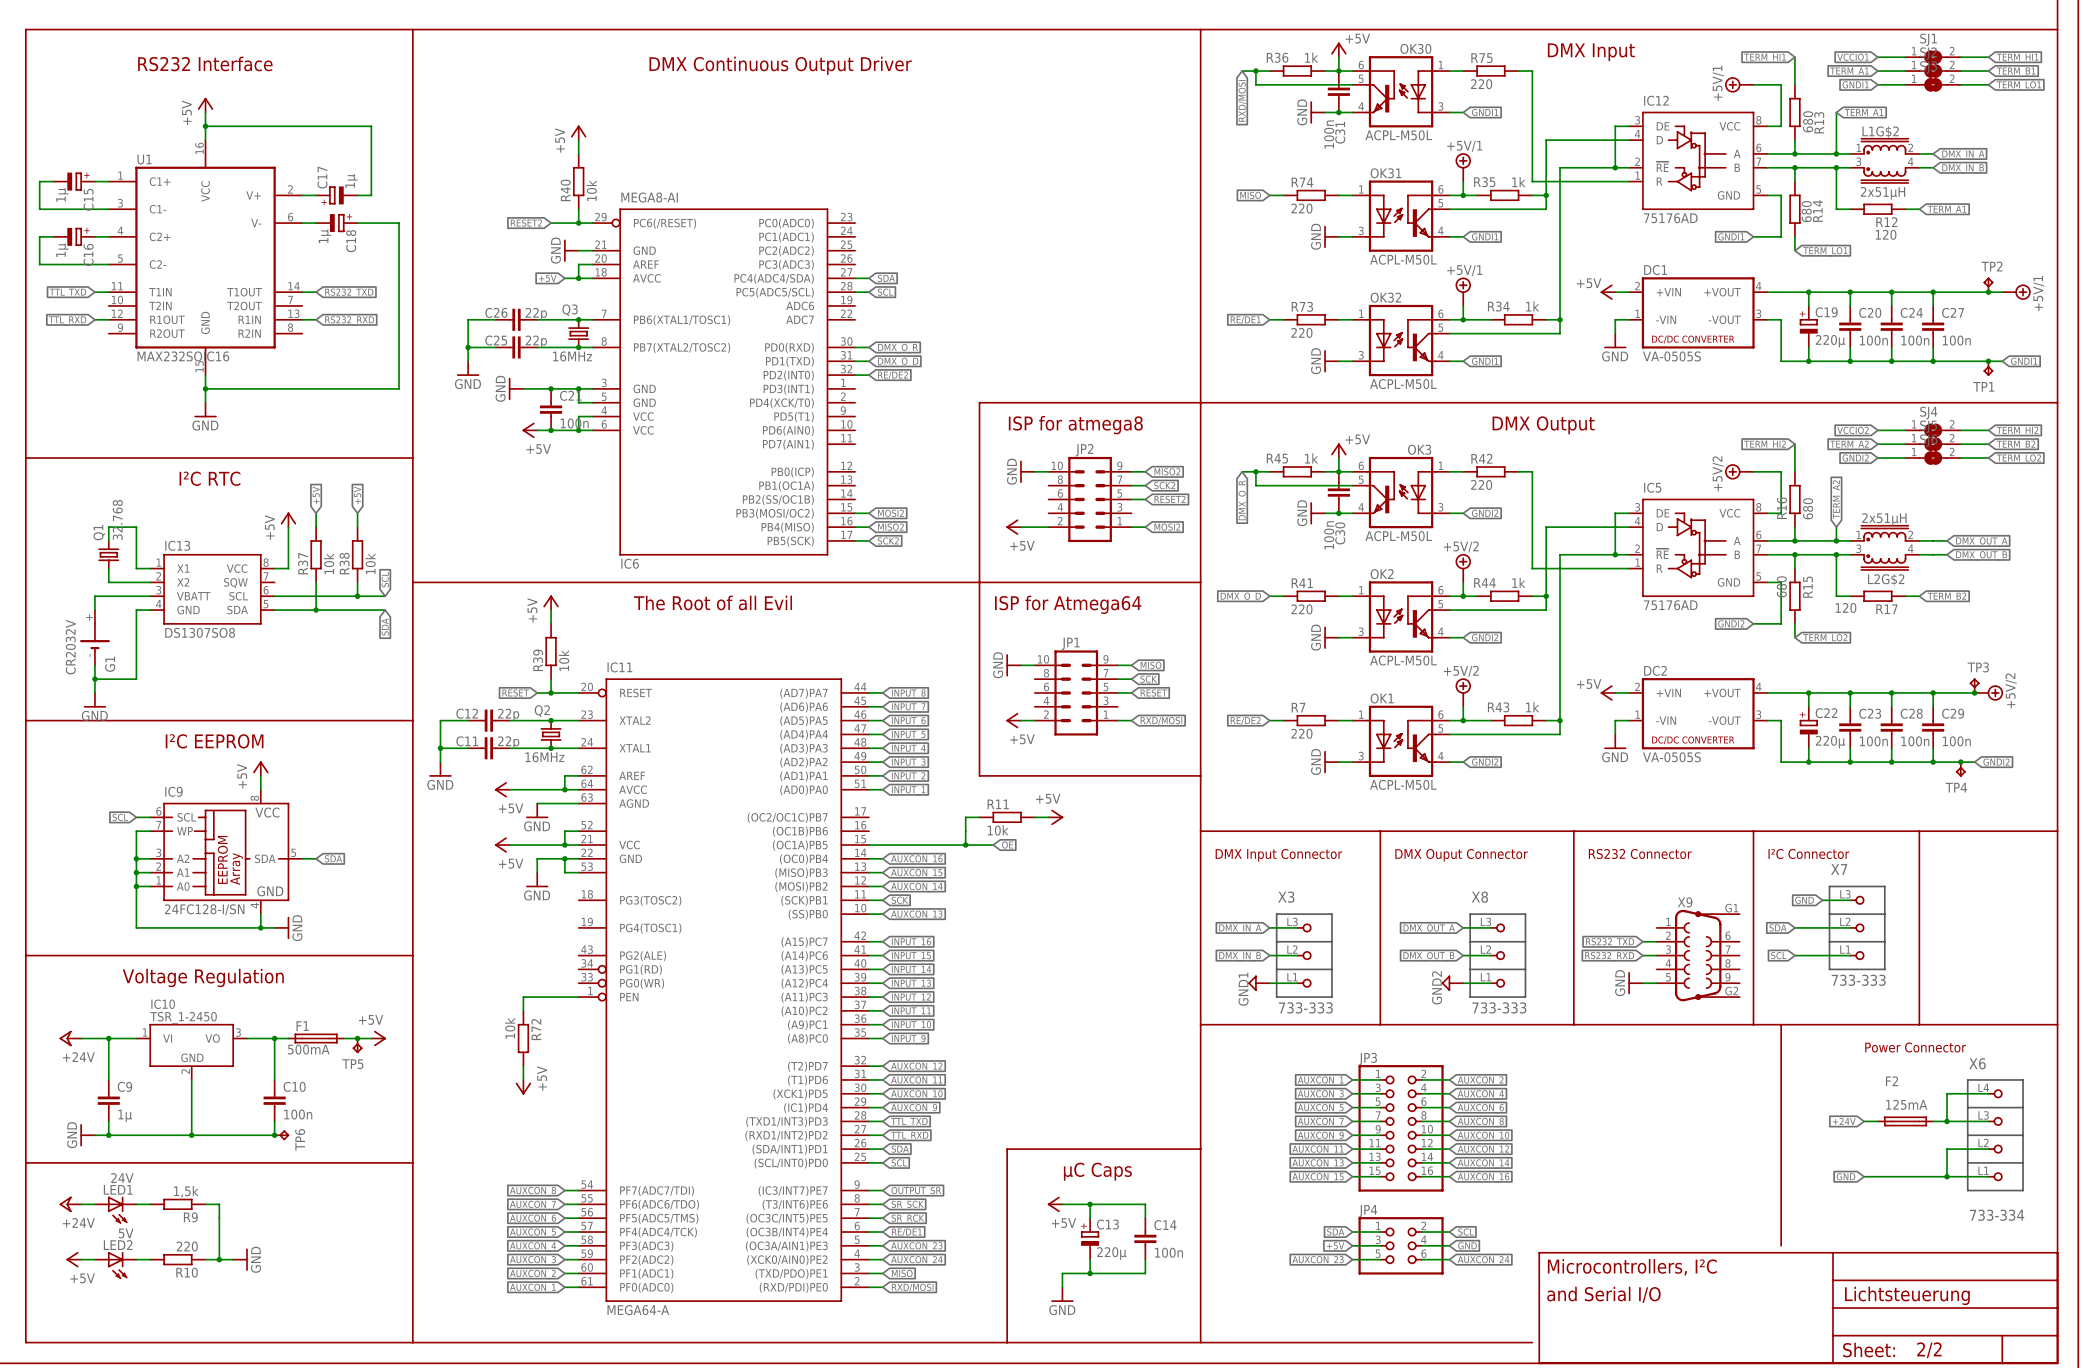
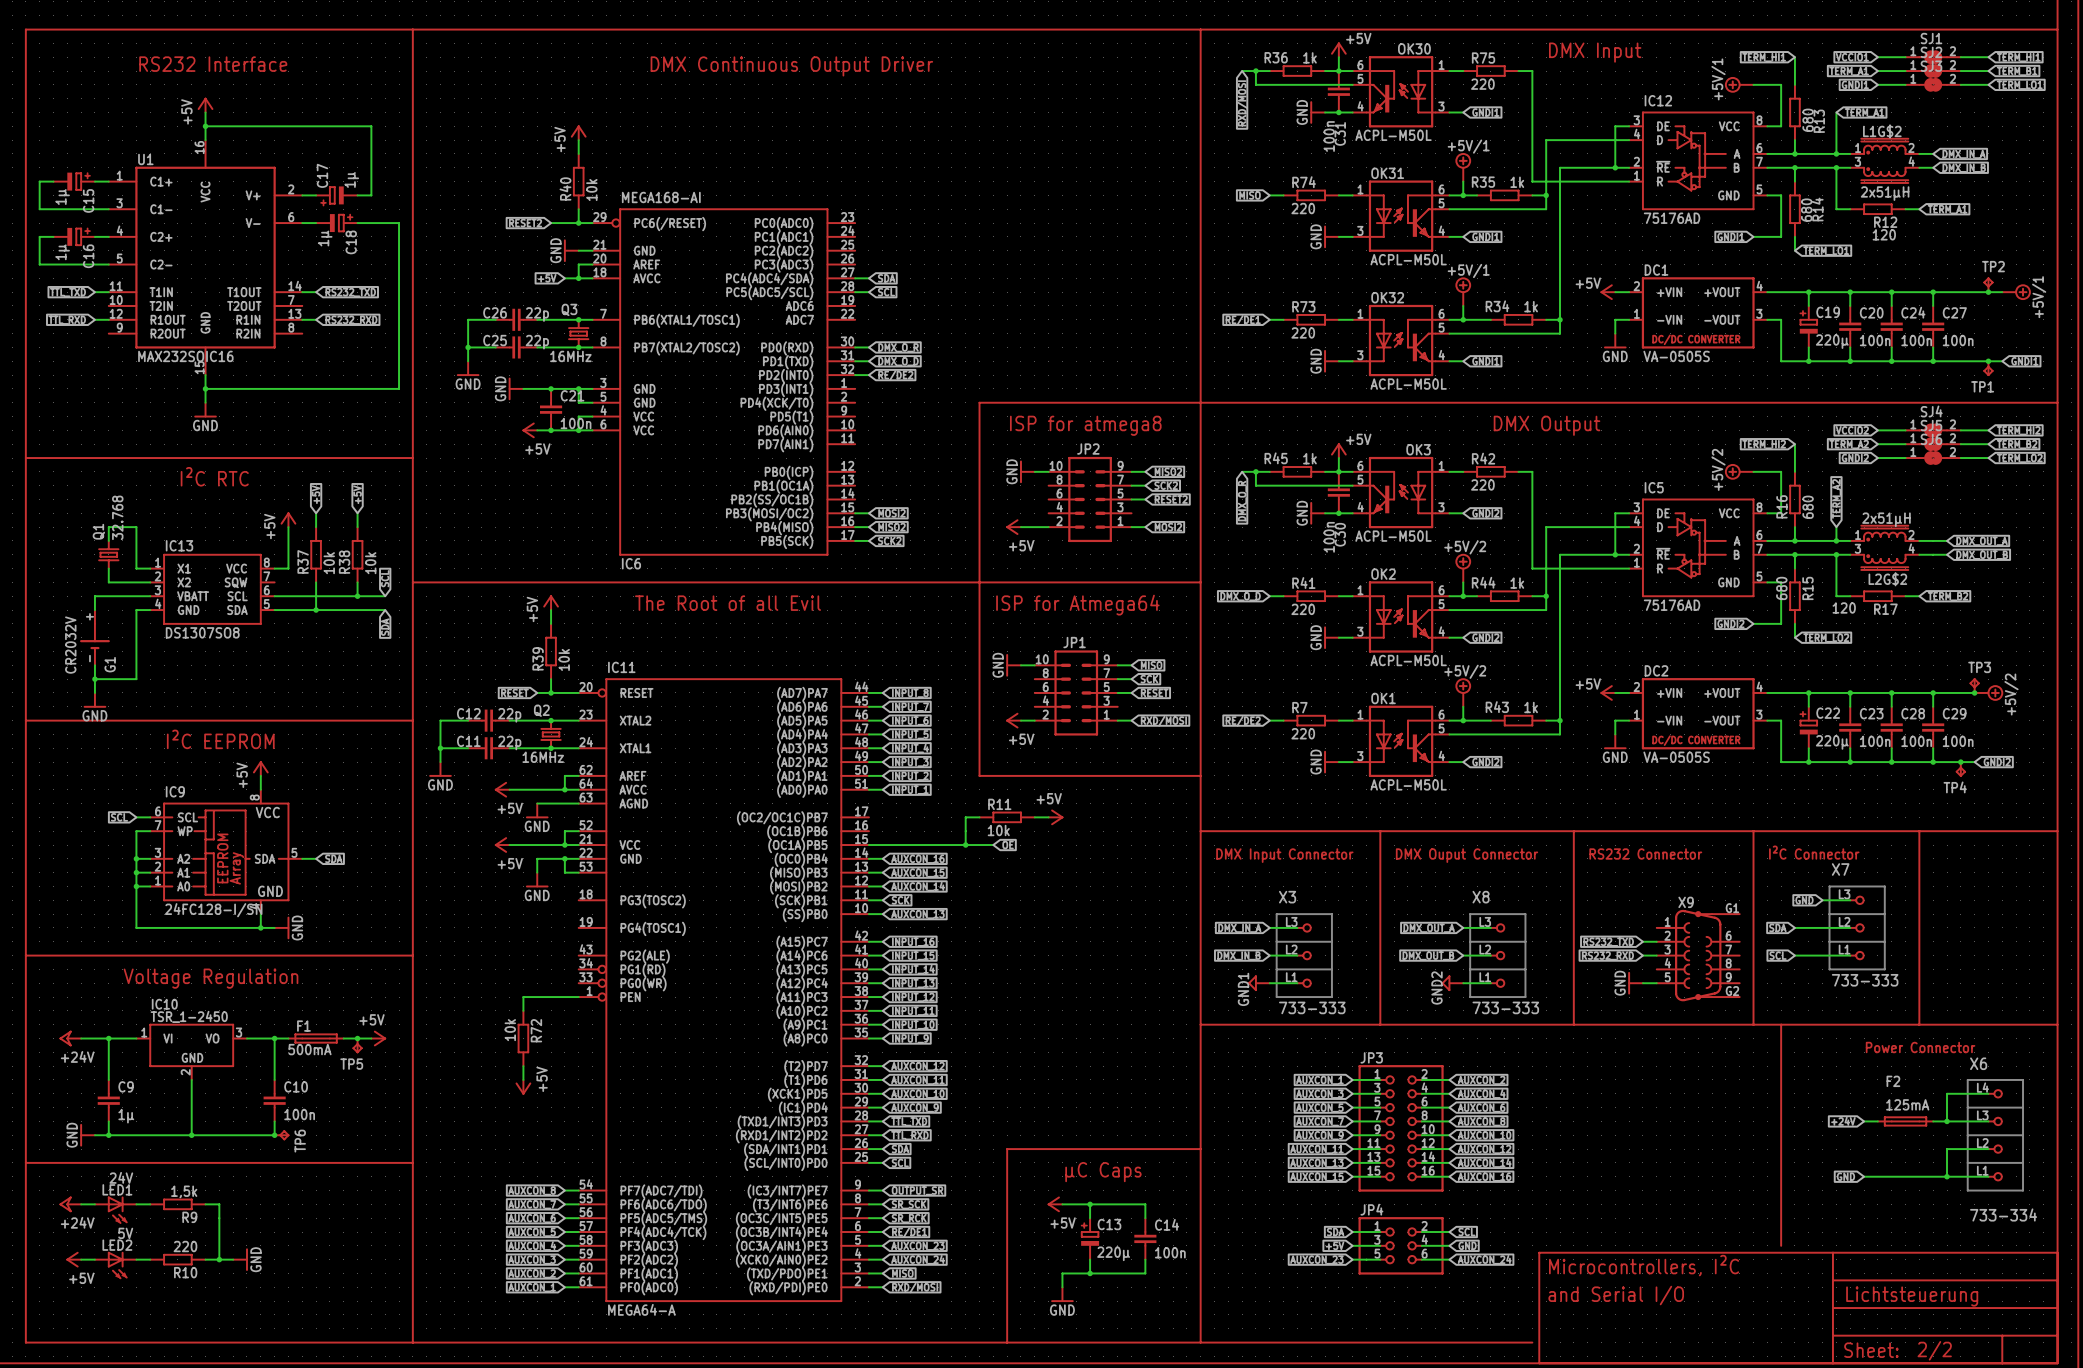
IC6 value: MEGA8-AI (649, 197) -> MEGA168-AI (661, 197)

